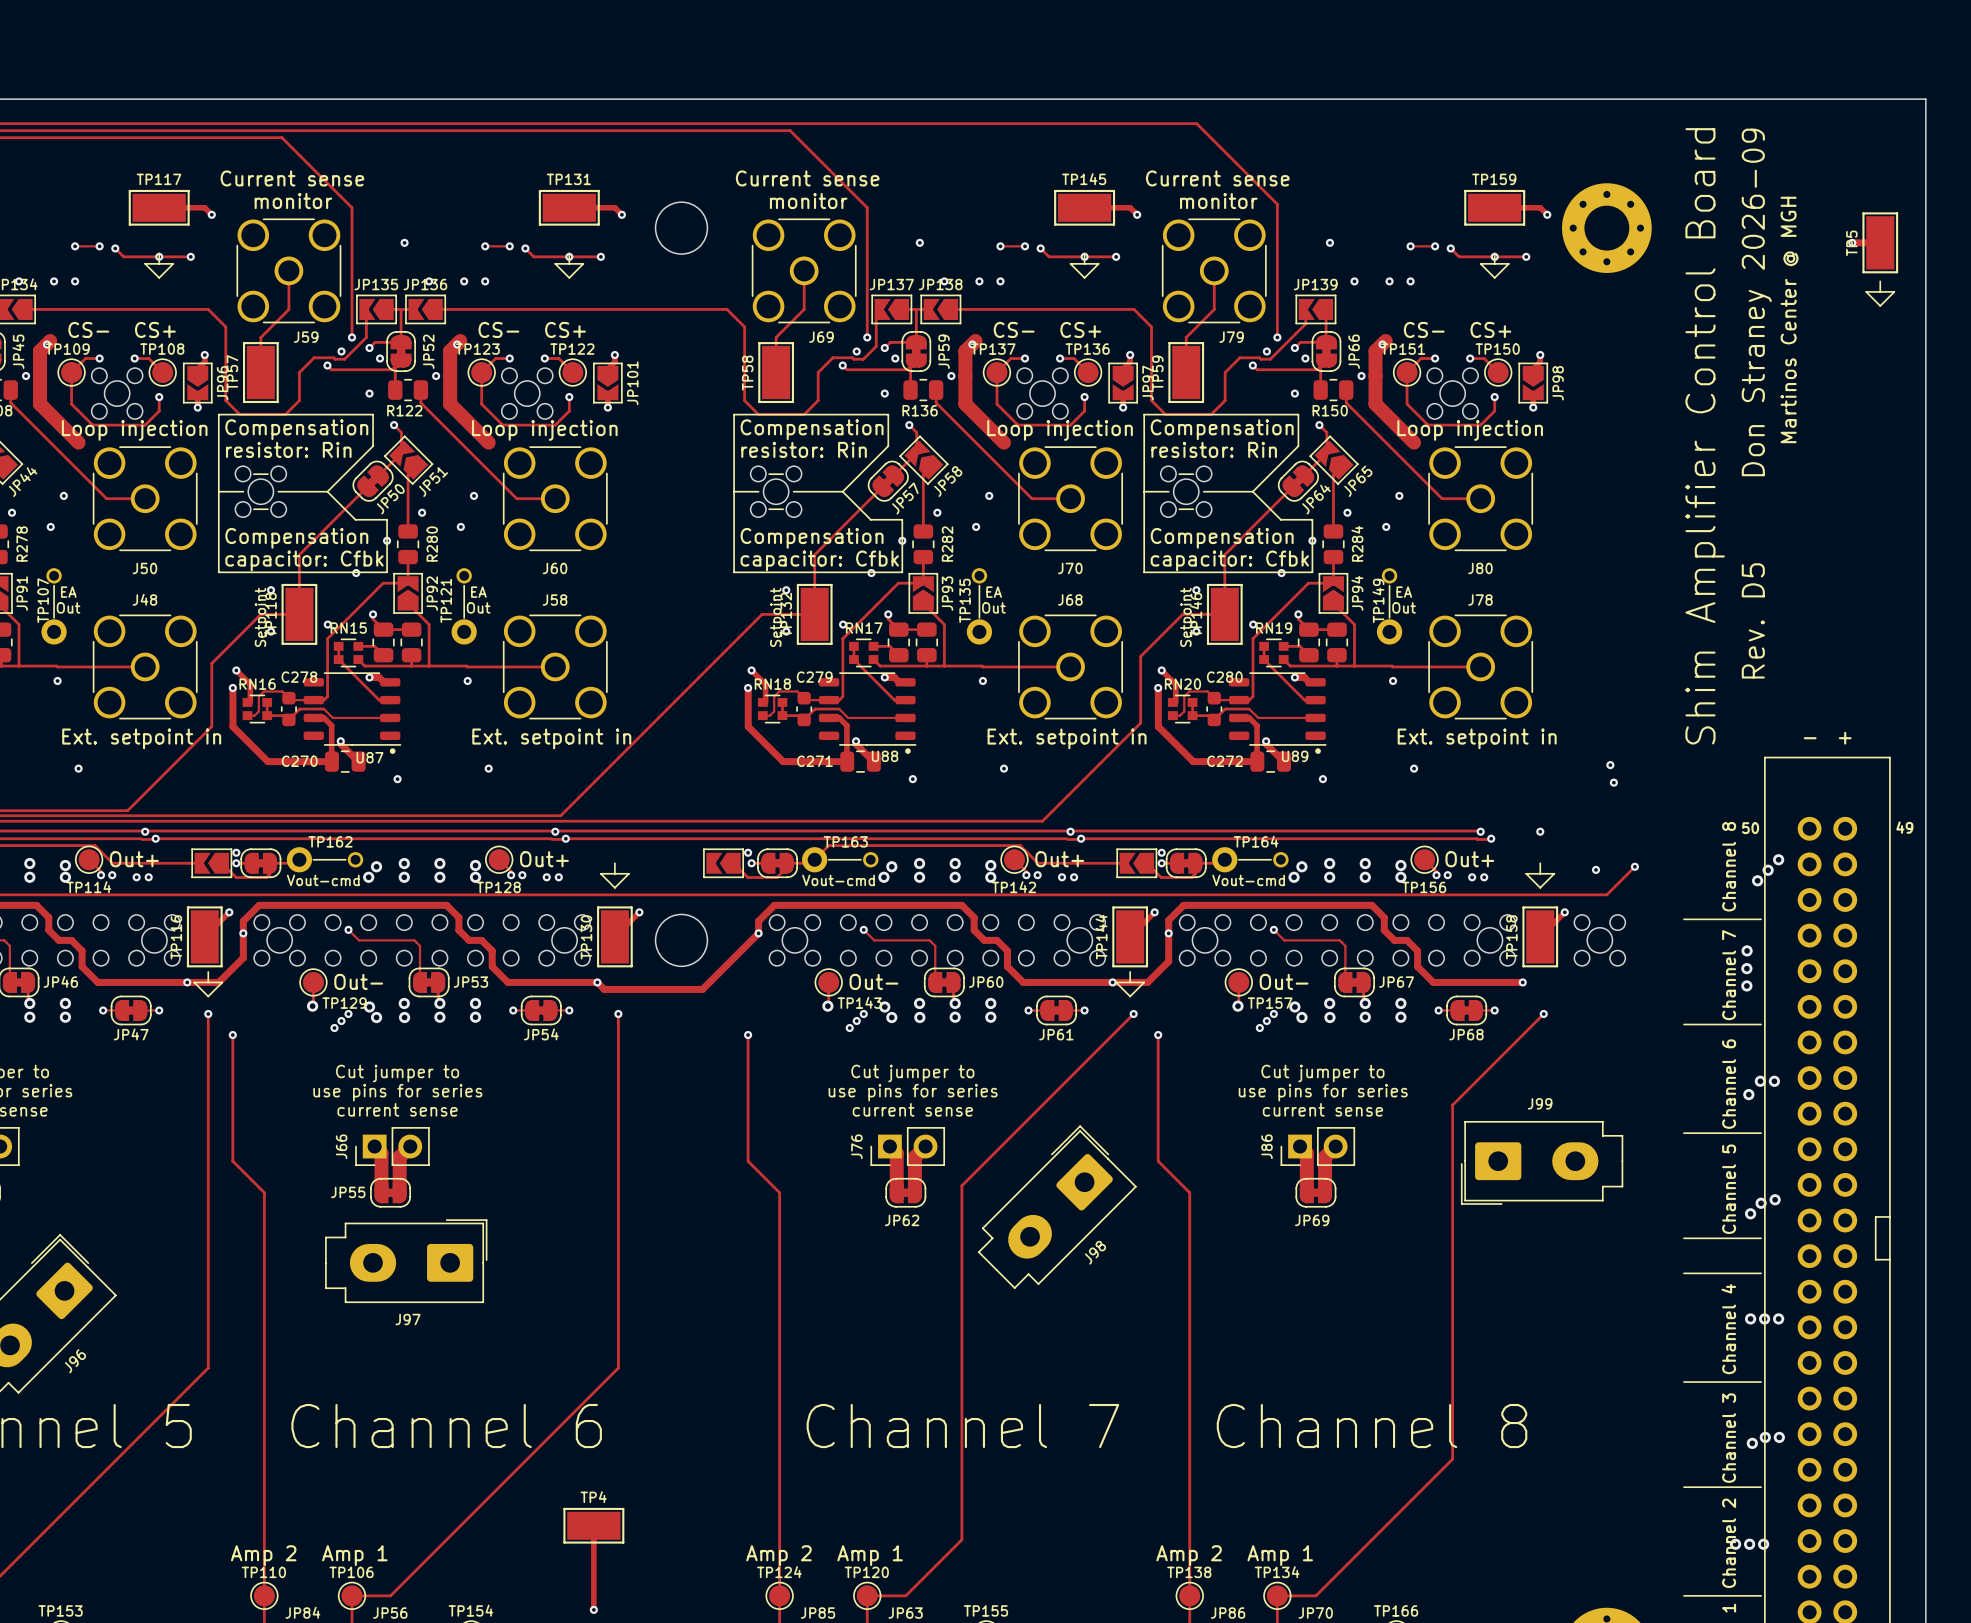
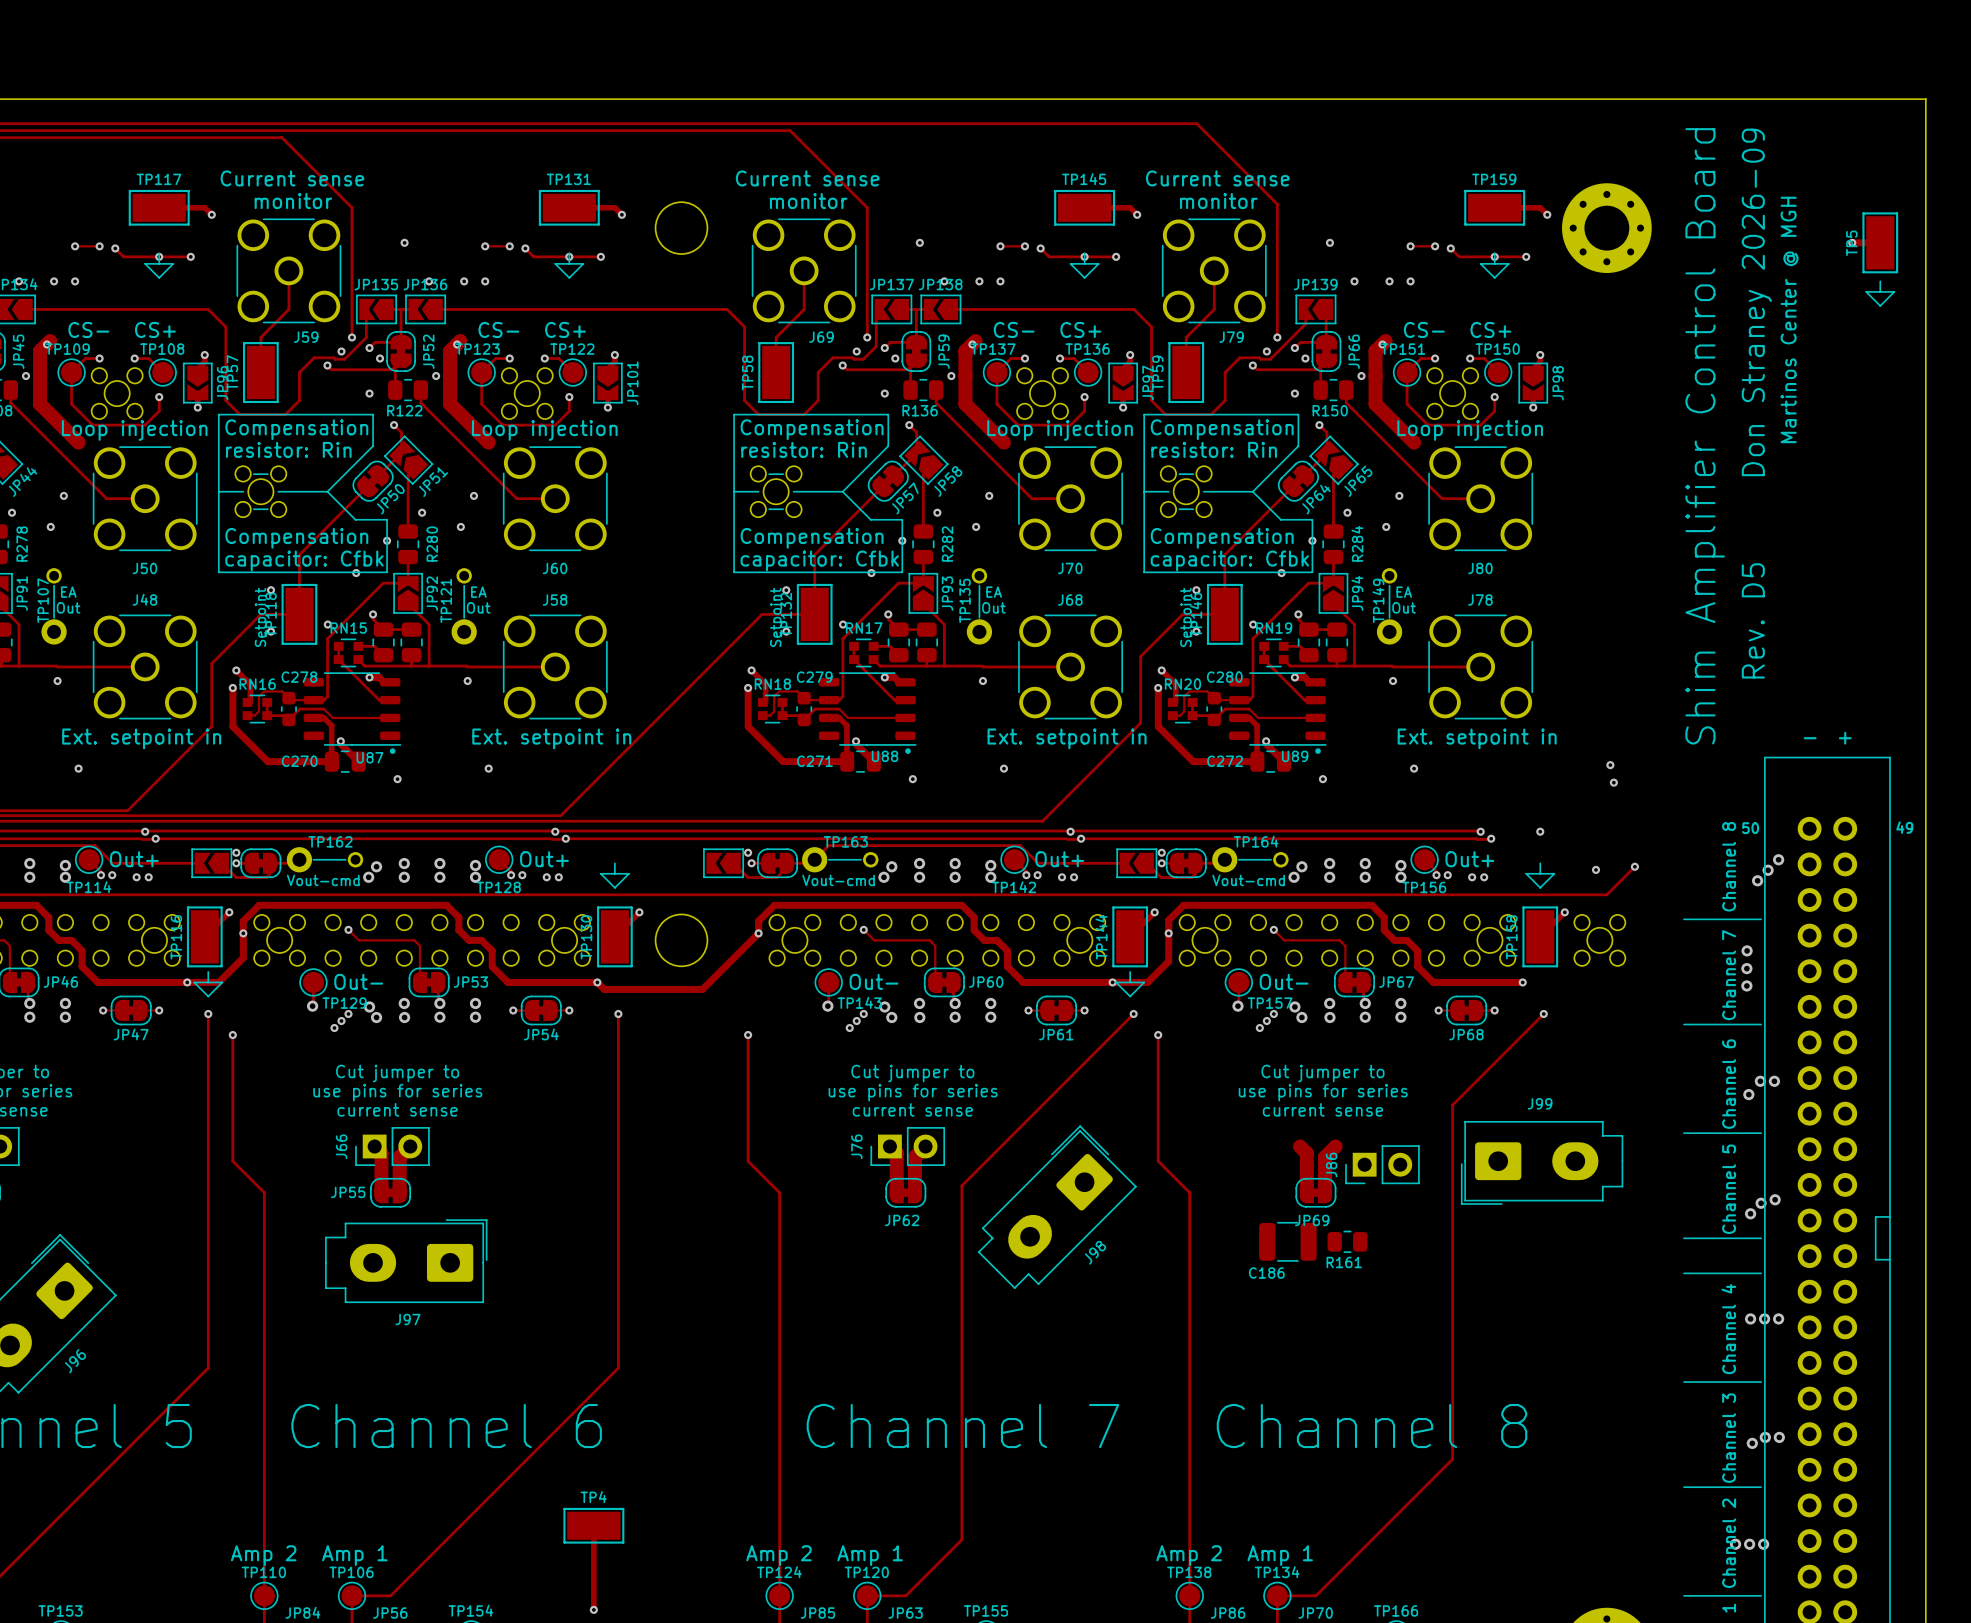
J86 position: (1317, 1146) -> (1382, 1164)
C186: none -> (1287, 1241)
R161: none -> (1347, 1241)

